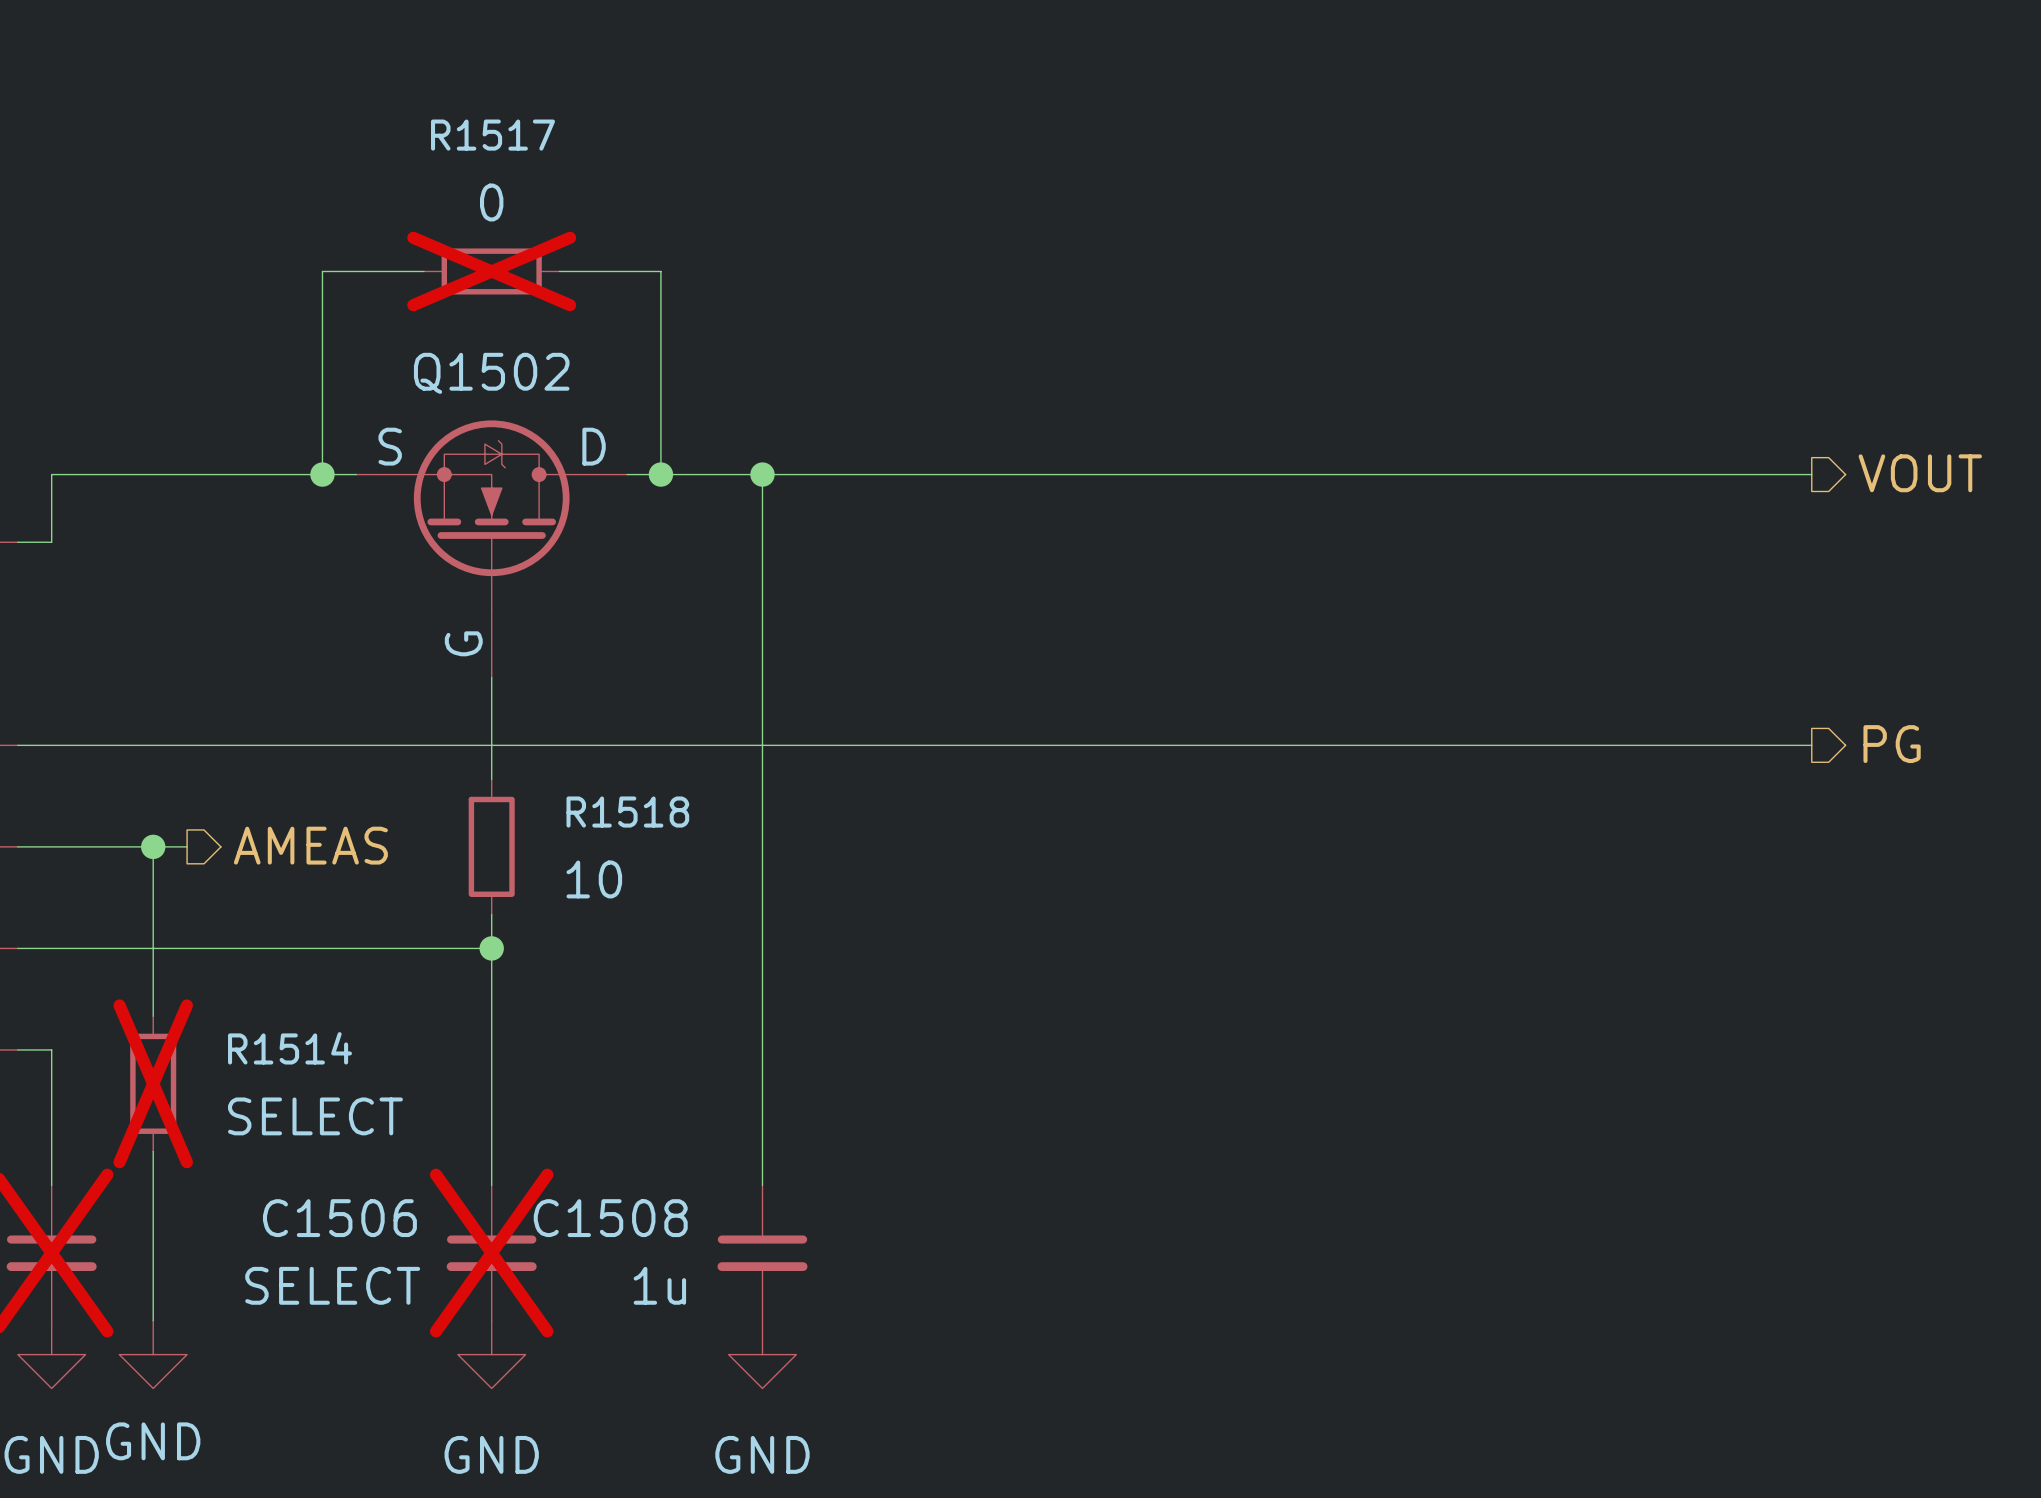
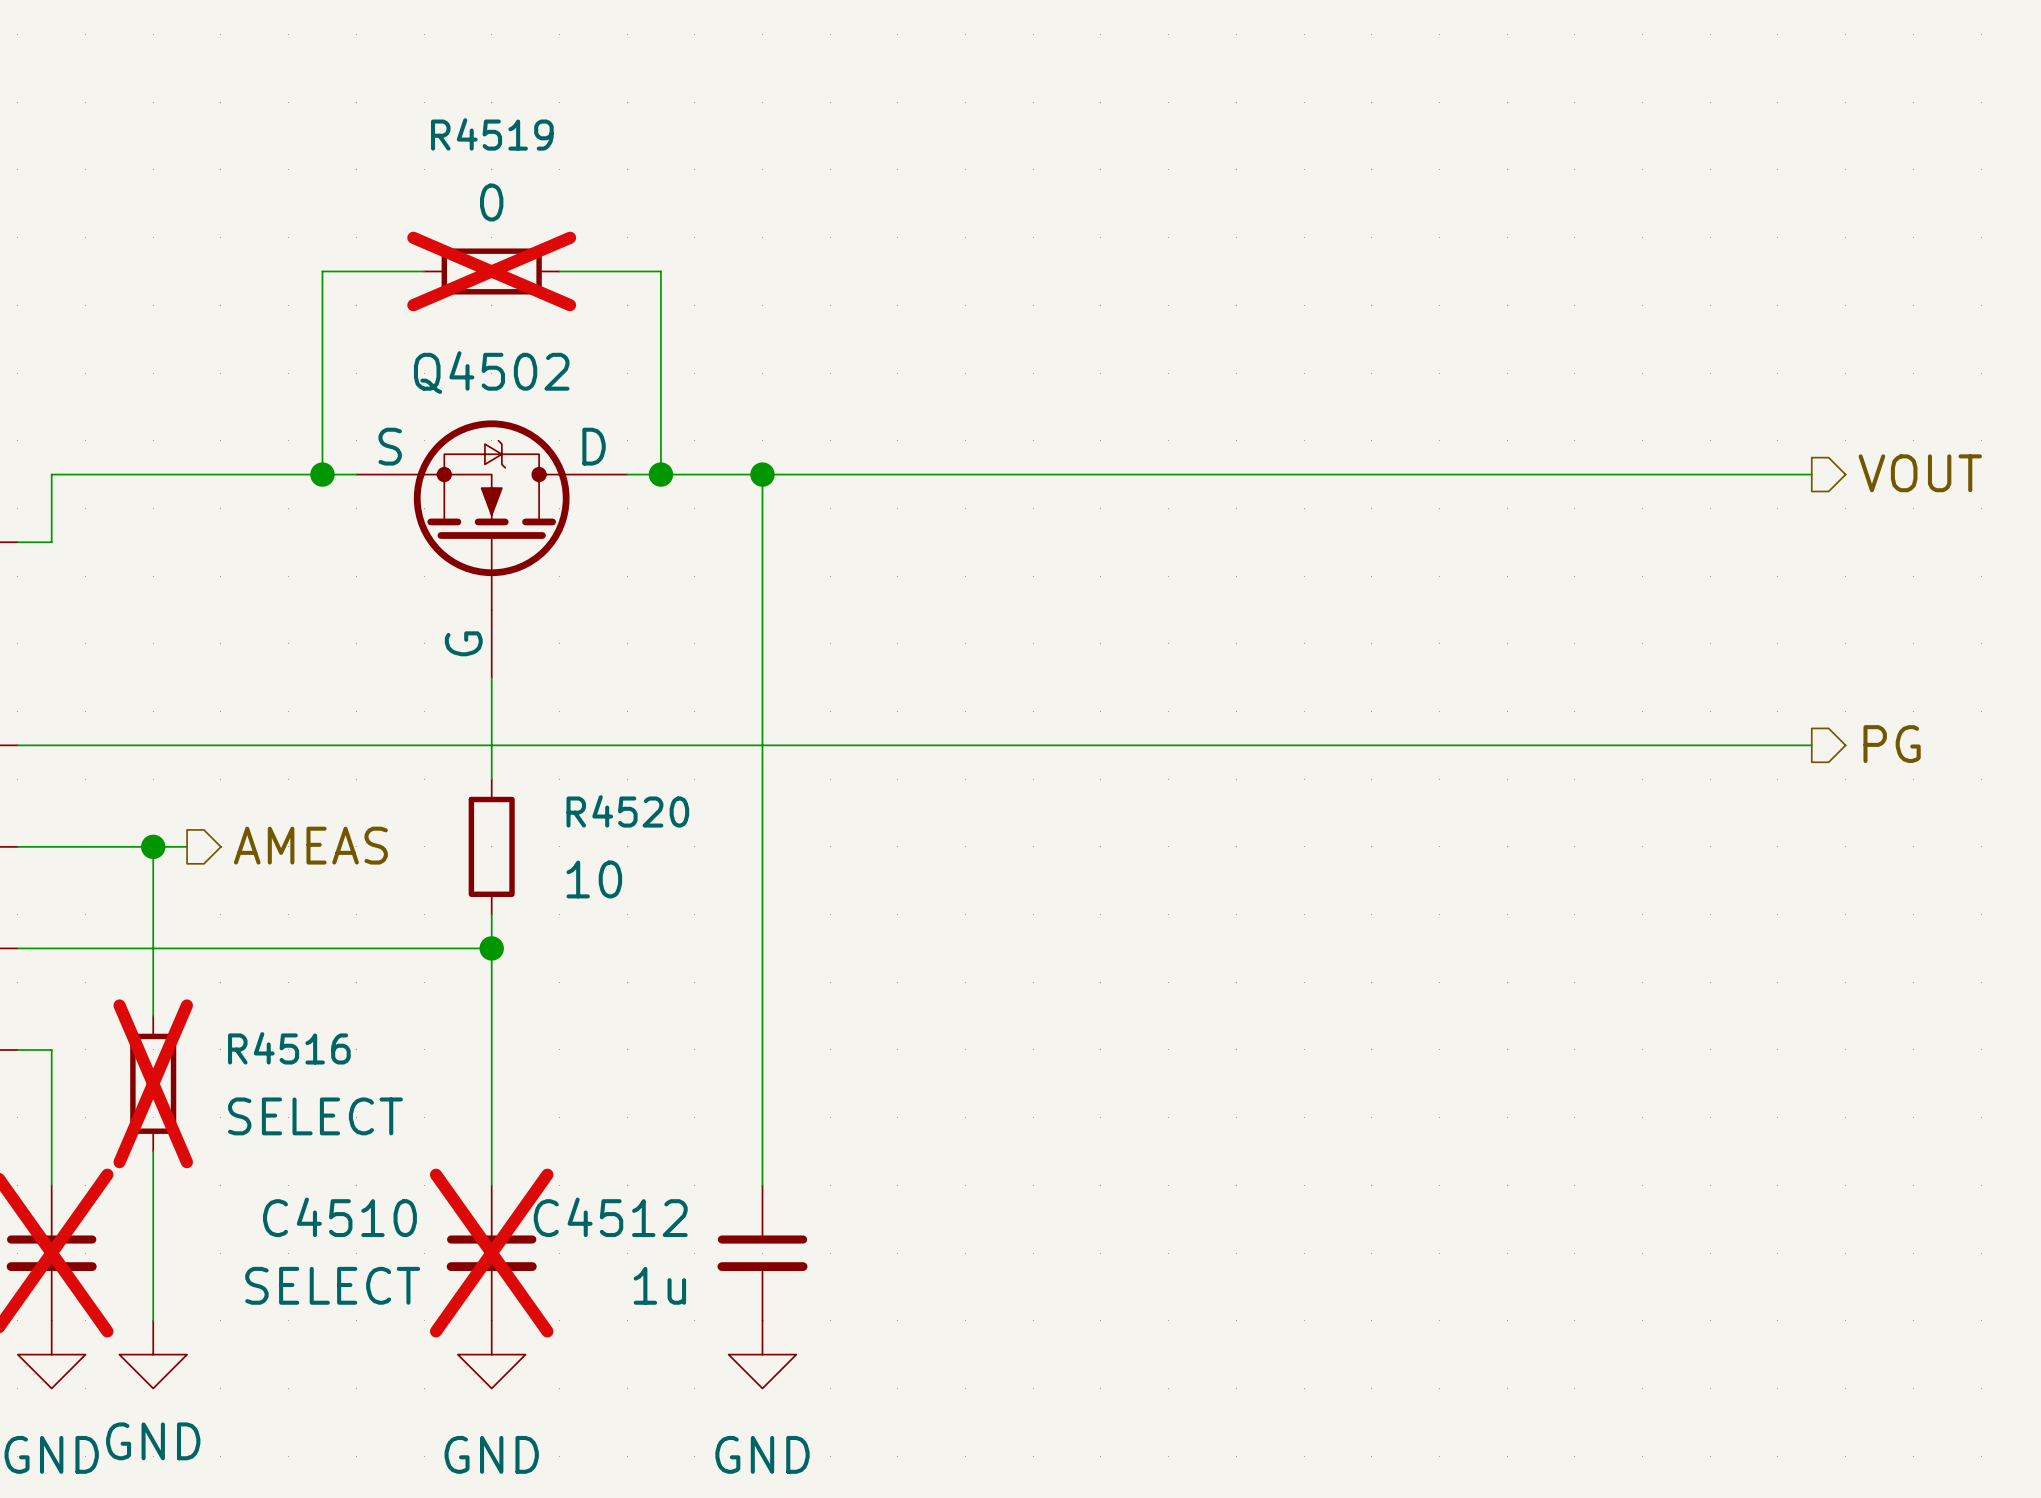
R1517 name: R1517 (492, 135) -> R4519 (492, 134)
Q1502 name: Q1502 (491, 373) -> Q4502 (491, 372)
R1518 name: R1518 (627, 812) -> R4520 (627, 811)
R1514 name: R1514 (290, 1048) -> R4516 (289, 1048)
C1506 name: C1506 (339, 1218) -> C4510 (339, 1217)
C1508 name: C1508 (610, 1218) -> C4512 (610, 1217)

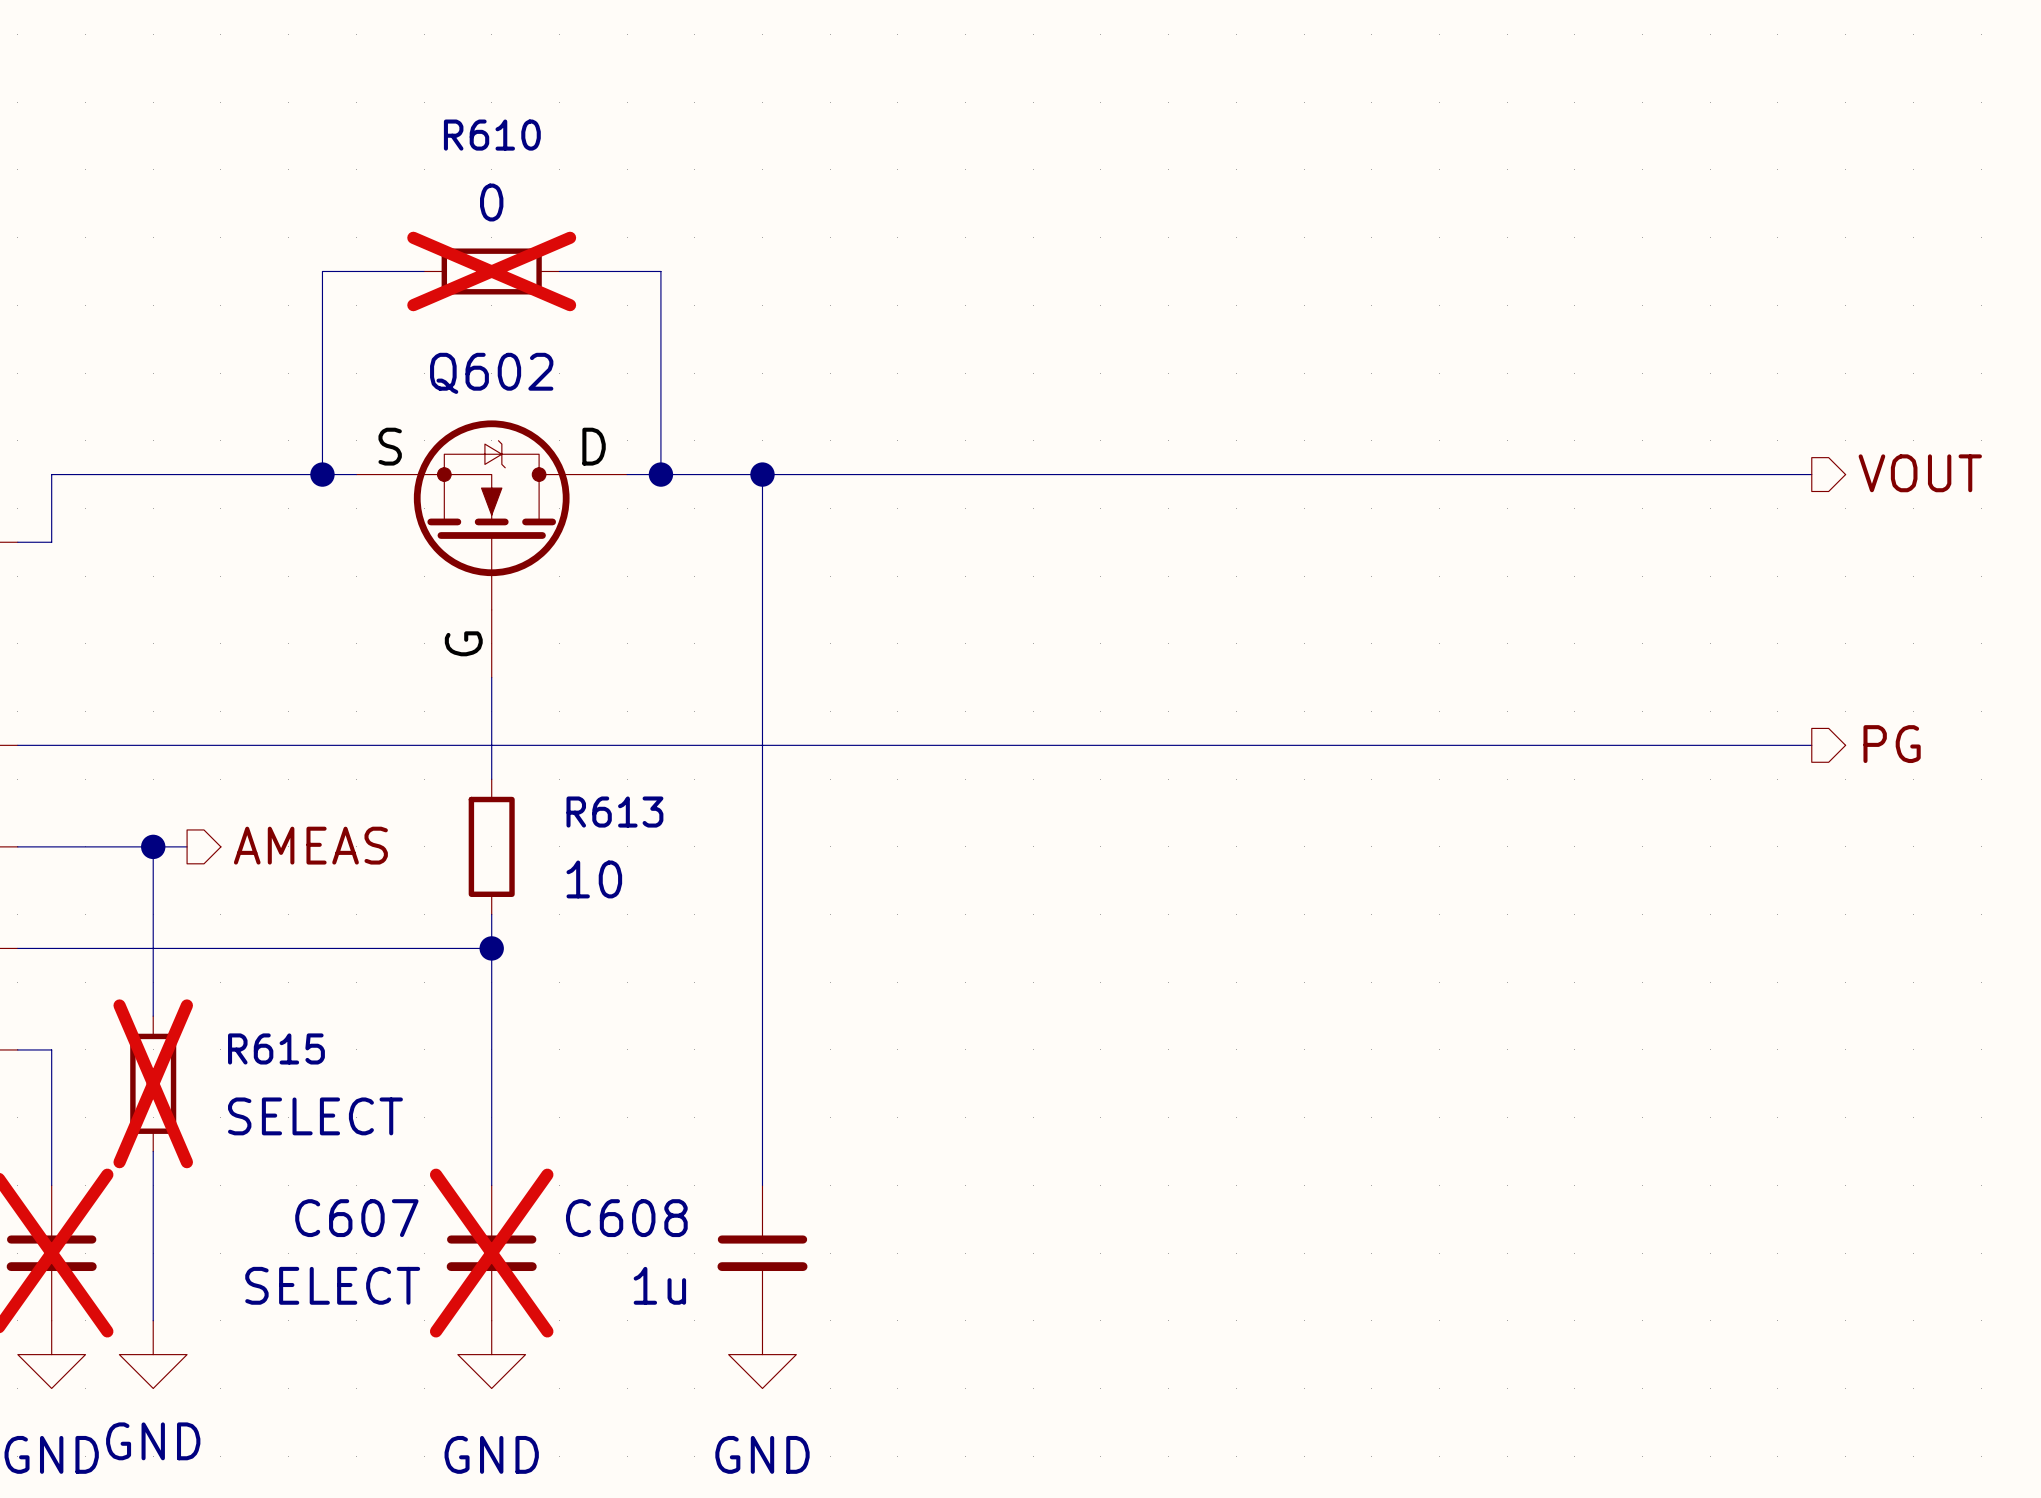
R4519 name: R4519 (492, 134) -> R610 (492, 135)
Q4502 name: Q4502 (491, 372) -> Q602 (491, 373)
R4520 name: R4520 (627, 811) -> R613 (614, 812)
R4516 name: R4516 (289, 1048) -> R615 (276, 1048)
C4510 name: C4510 (339, 1217) -> C607 (356, 1218)
C4512 name: C4512 (610, 1217) -> C608 (626, 1218)

